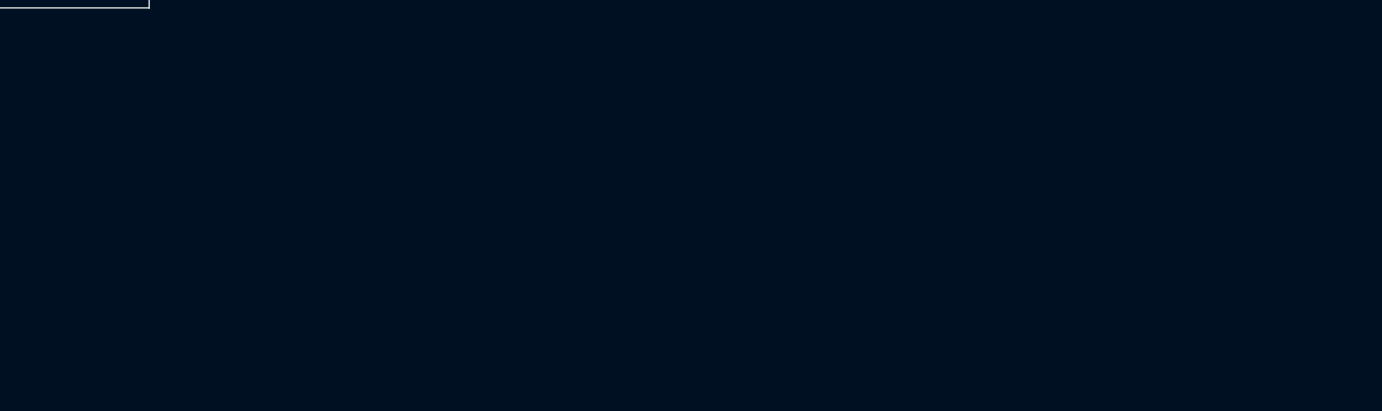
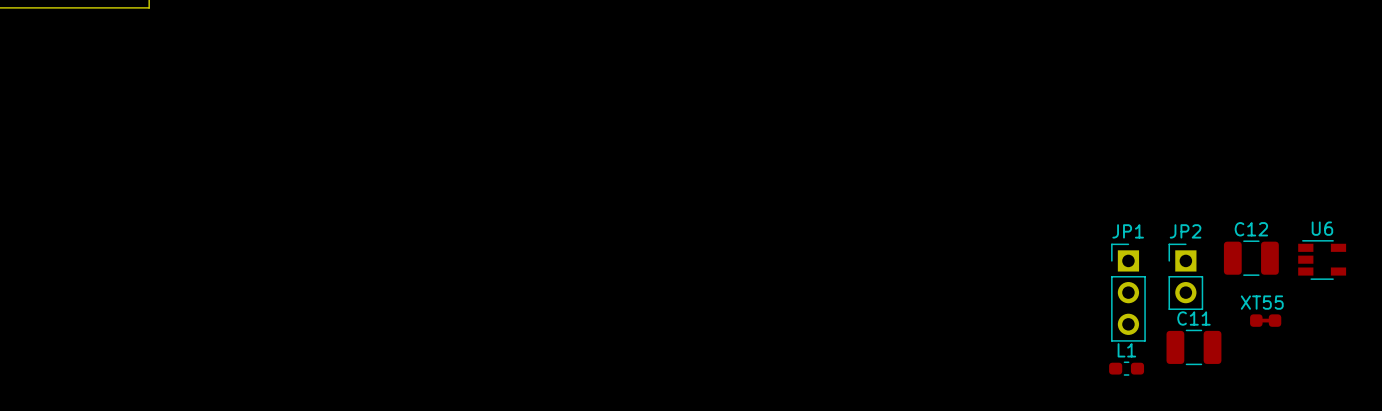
C12: none -> (1251, 258)
U6: none -> (1322, 259)
JP2: none -> (1185, 276)
JP1: none -> (1128, 292)
XT55: none -> (1265, 320)
C11: none -> (1193, 347)
L1: none -> (1126, 368)

